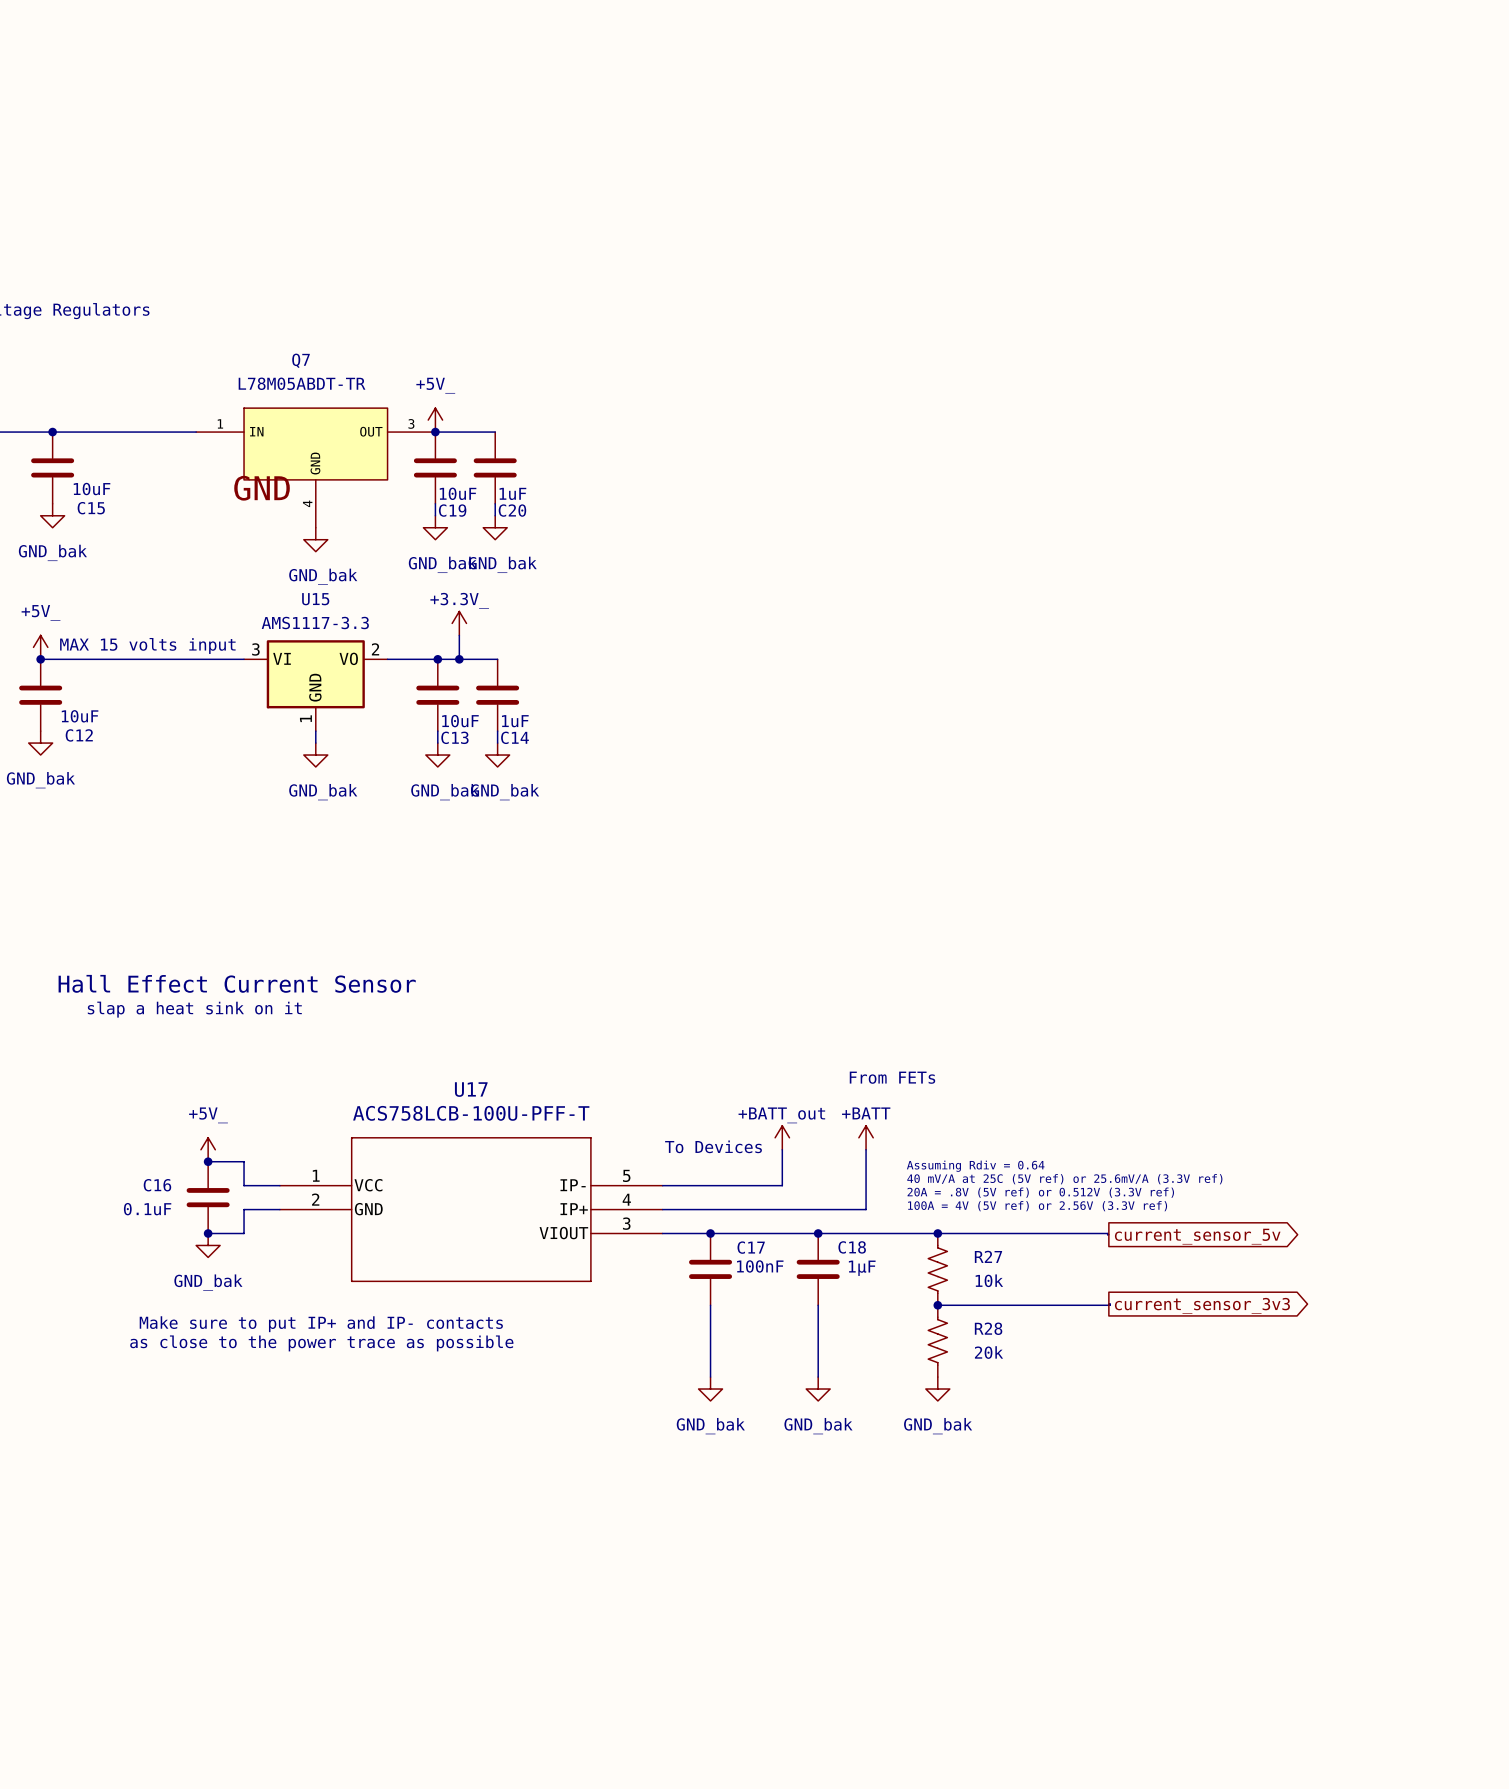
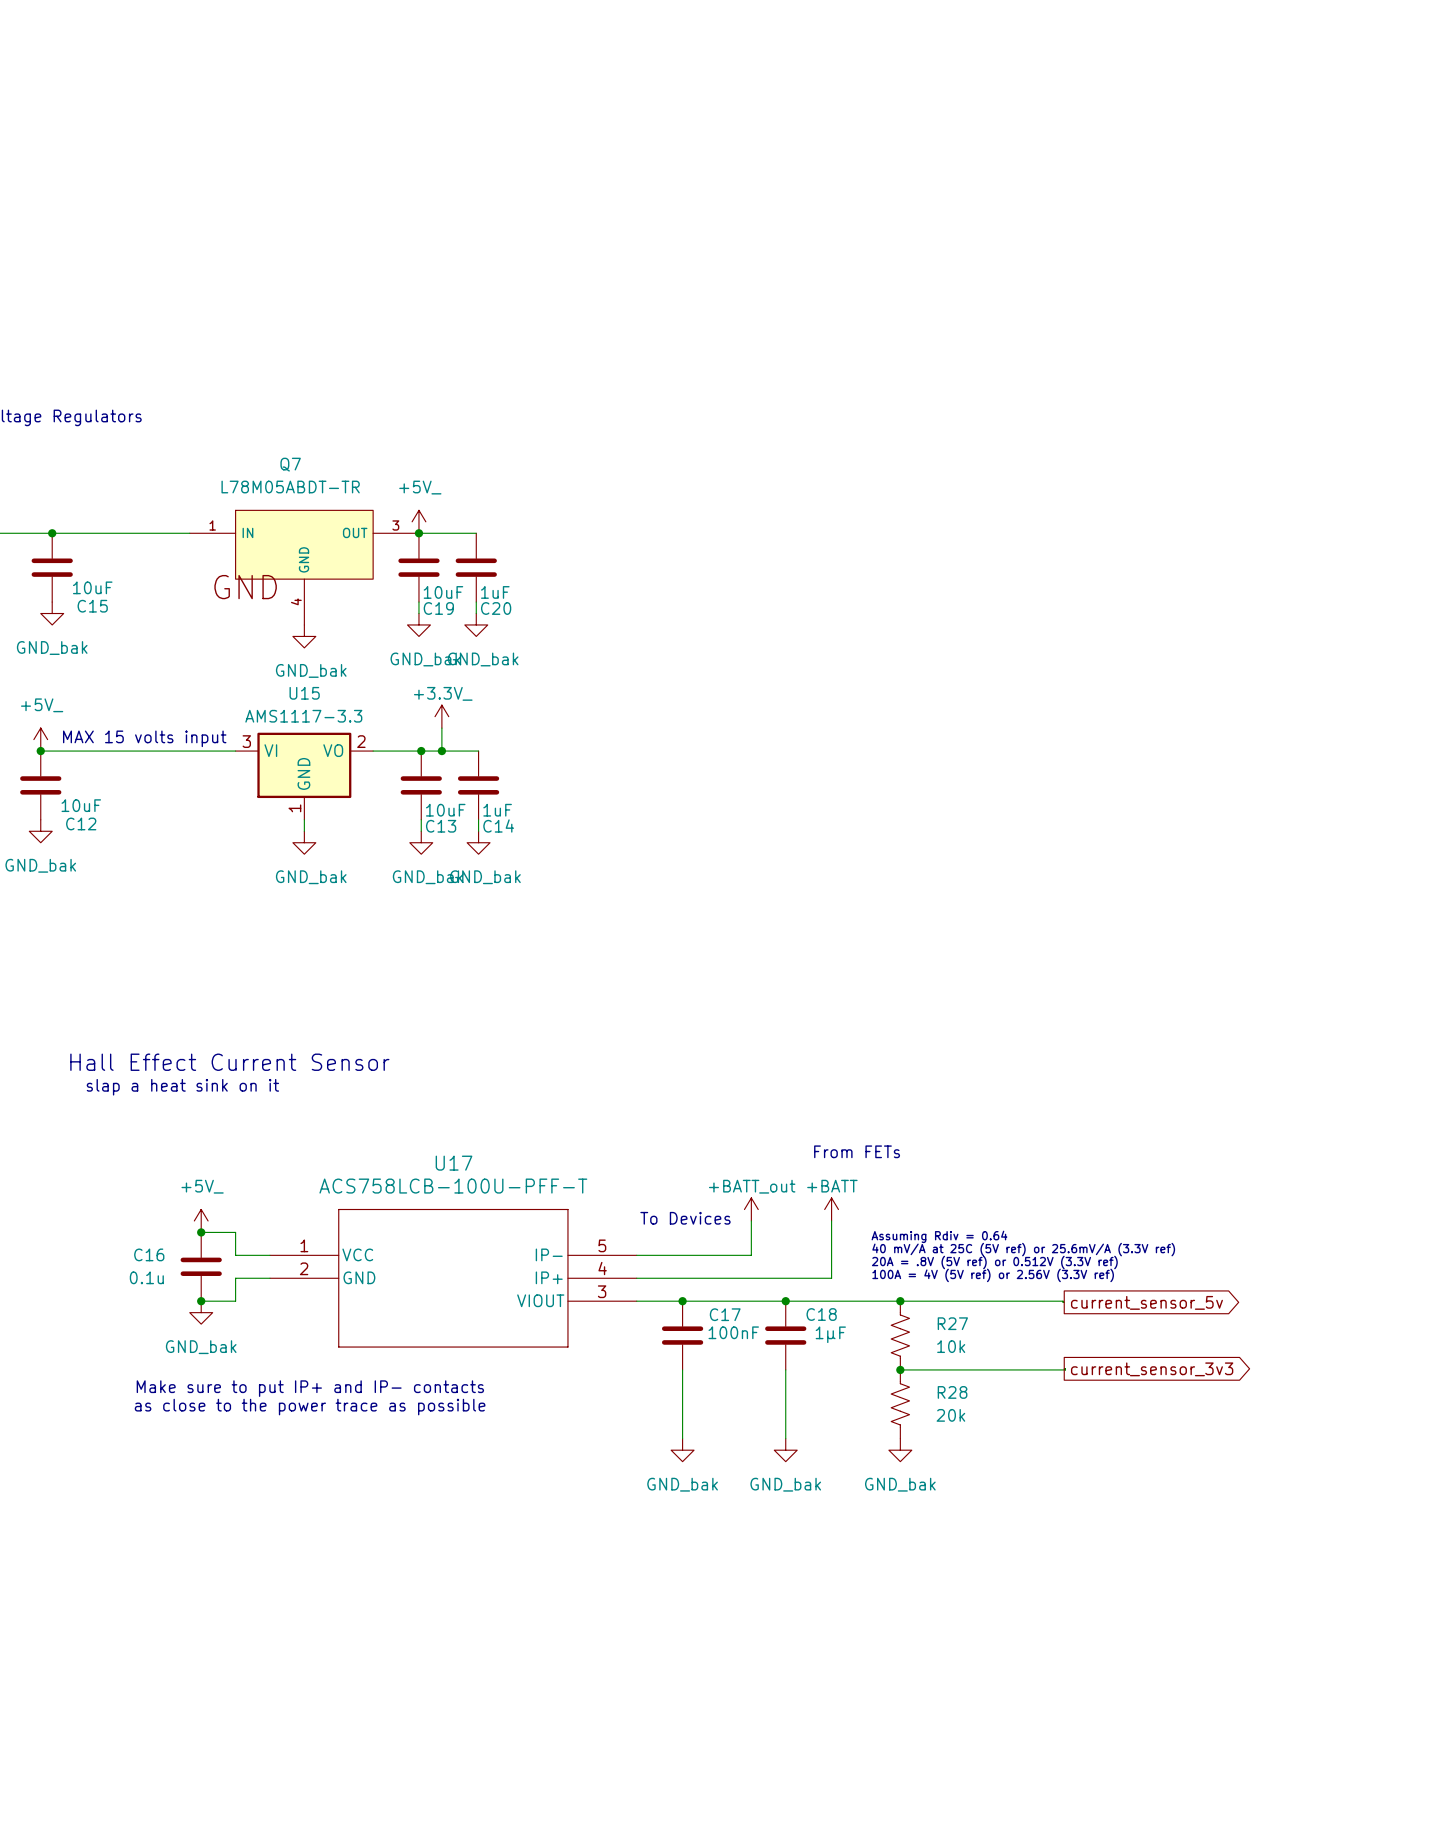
C16 value: 0.1uF (147, 1209) -> 0.1u (146, 1277)

